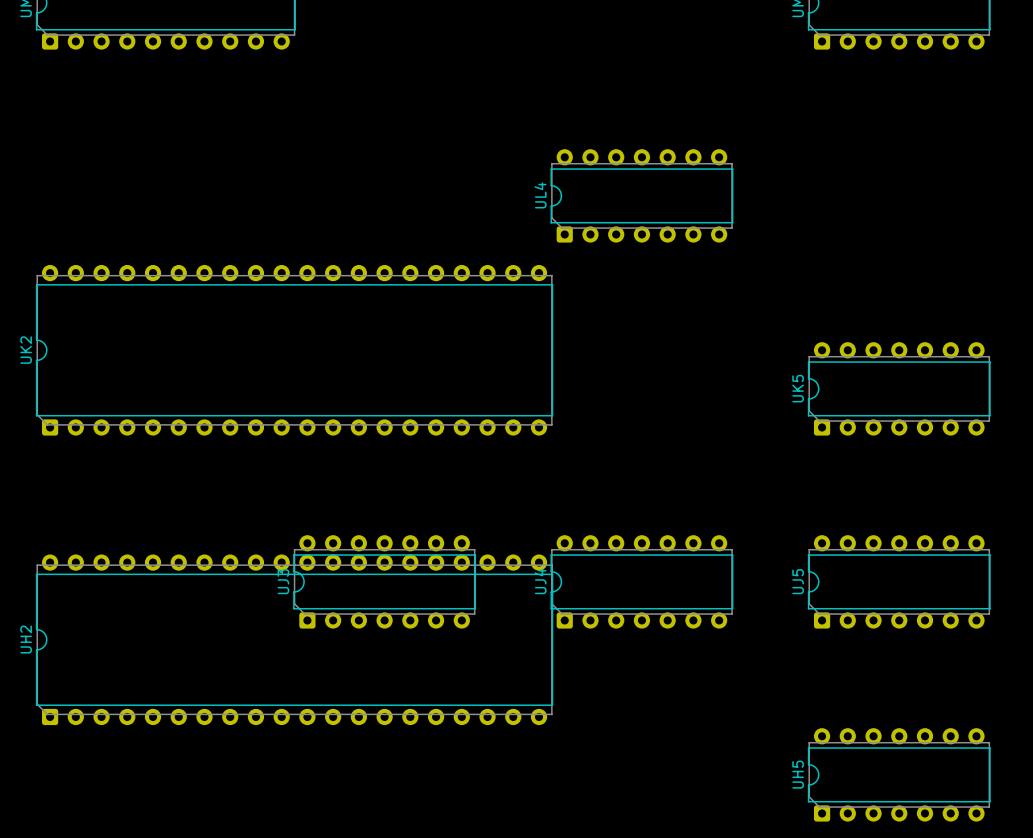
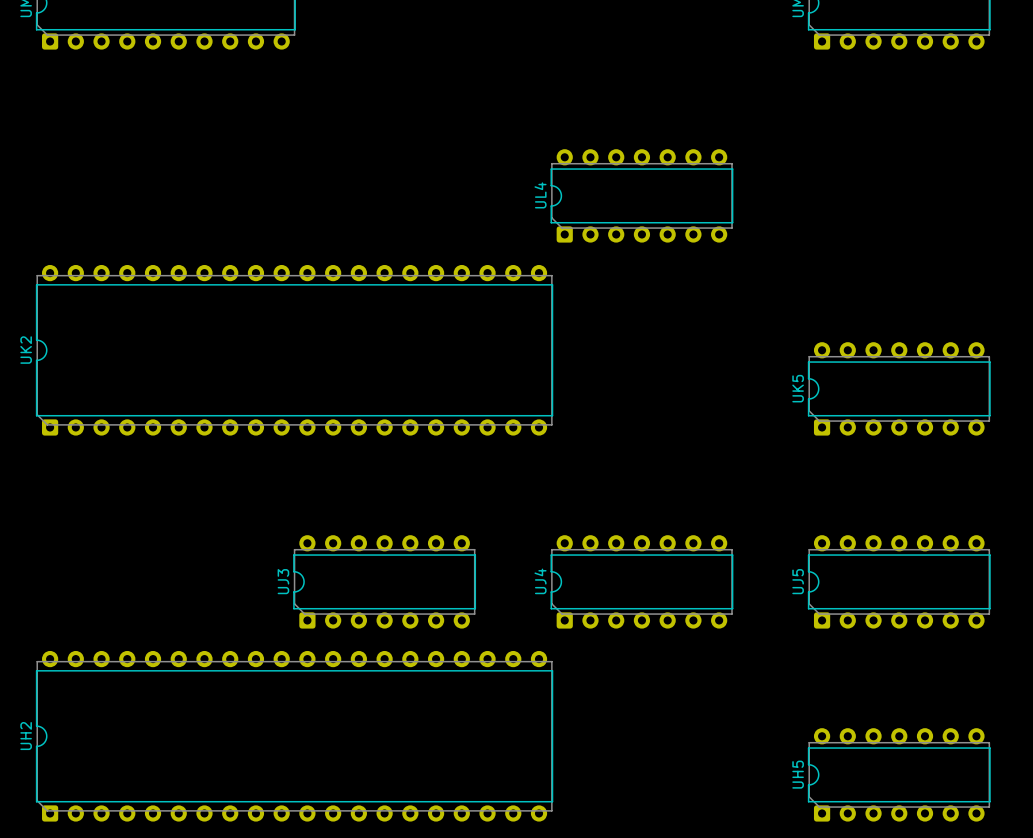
UH2 position: (294, 639) -> (294, 736)

